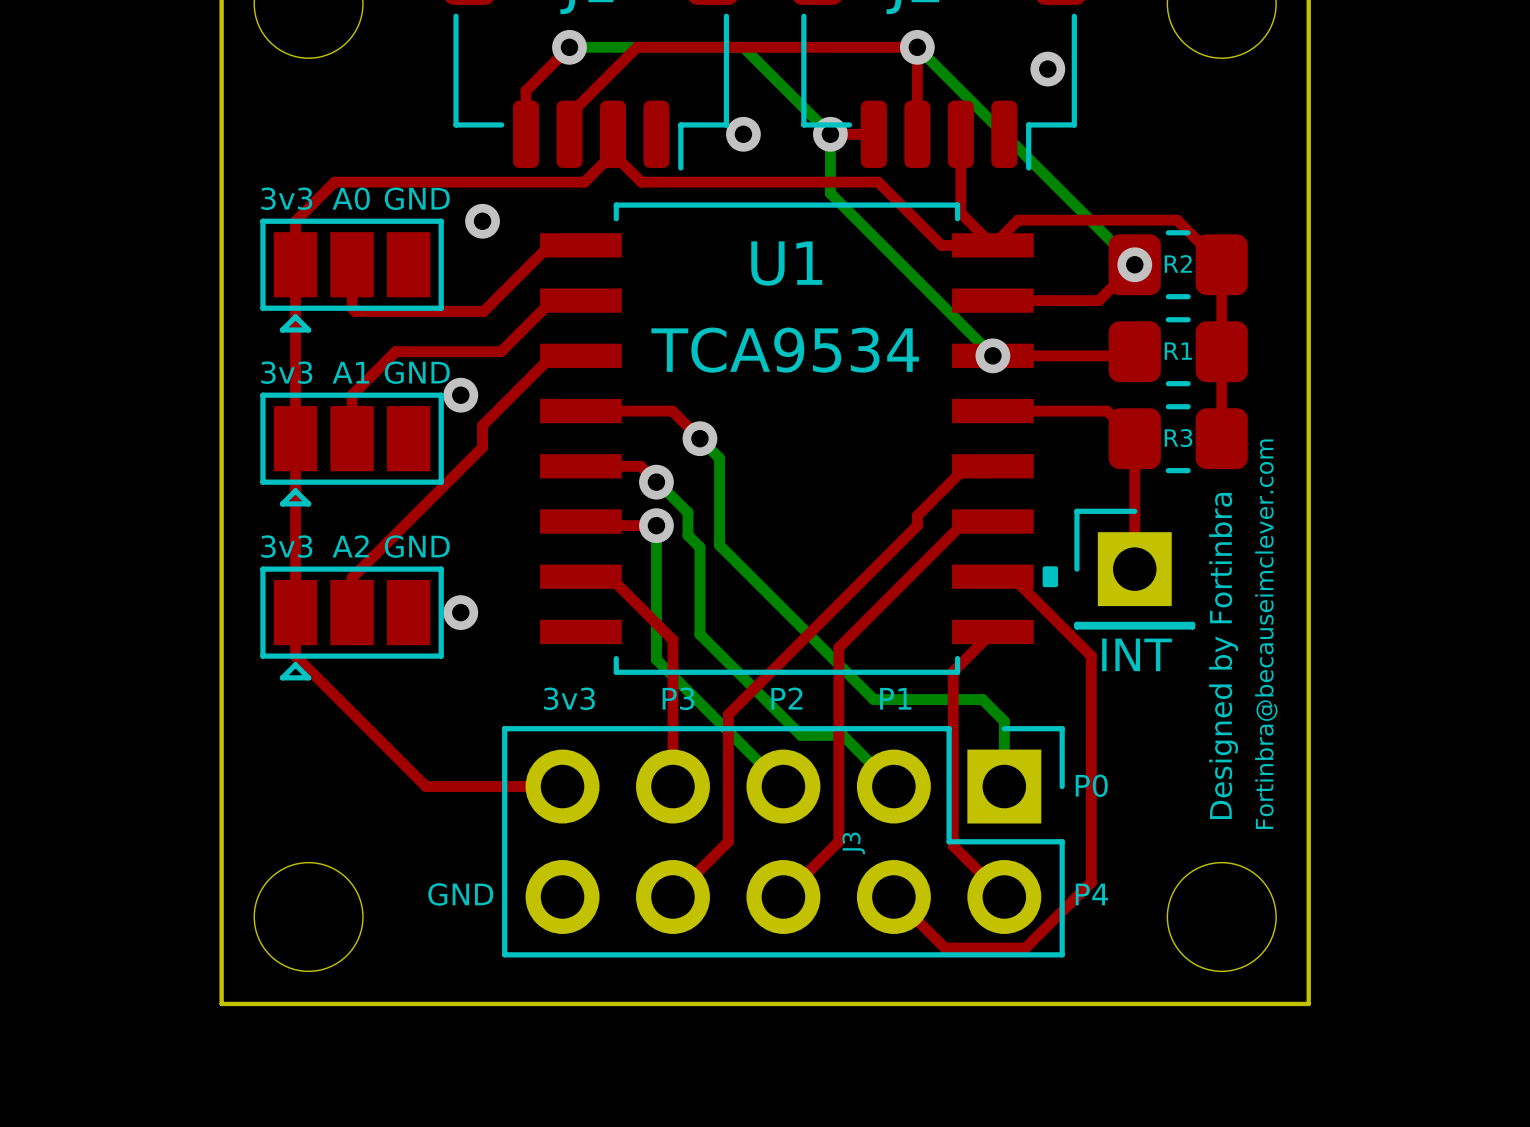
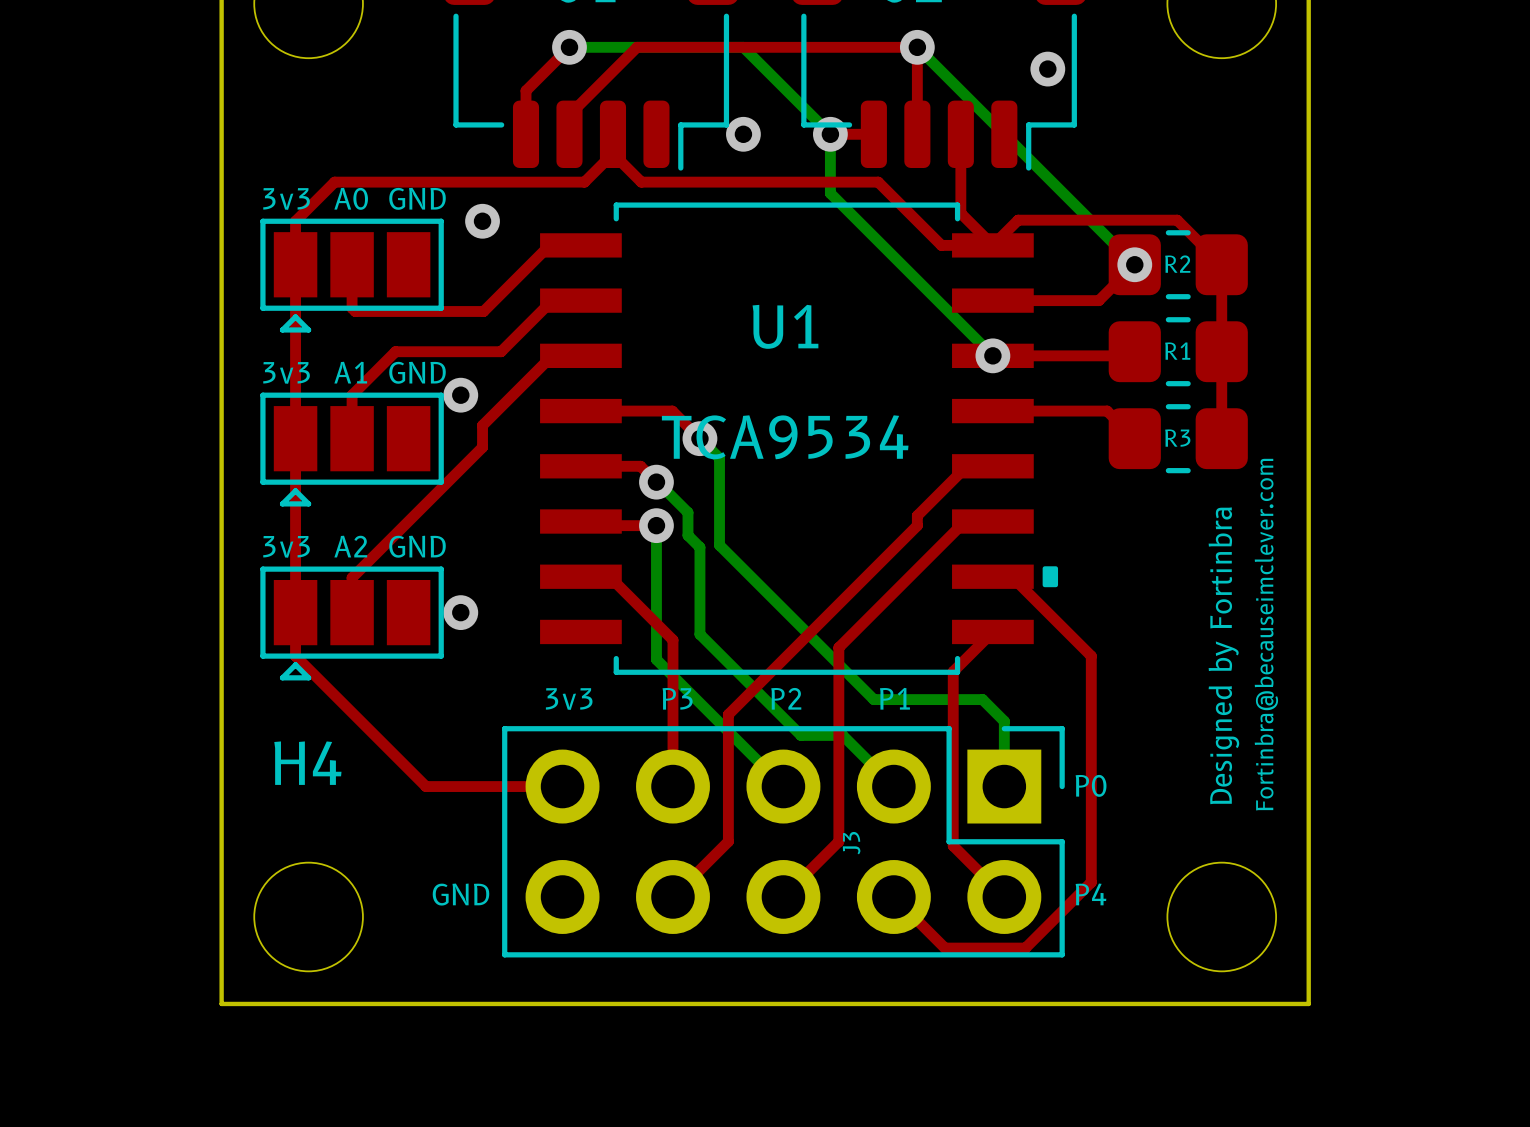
U1 name position: U1 (786, 263) -> U1 (785, 326)
U1 value position: TCA9534 (785, 350) -> TCA9534 (785, 437)
top track: (1134, 438) (1134, 569) -> none
part: (1134, 569) -> none
H4 name: none -> H4 (307, 763)

